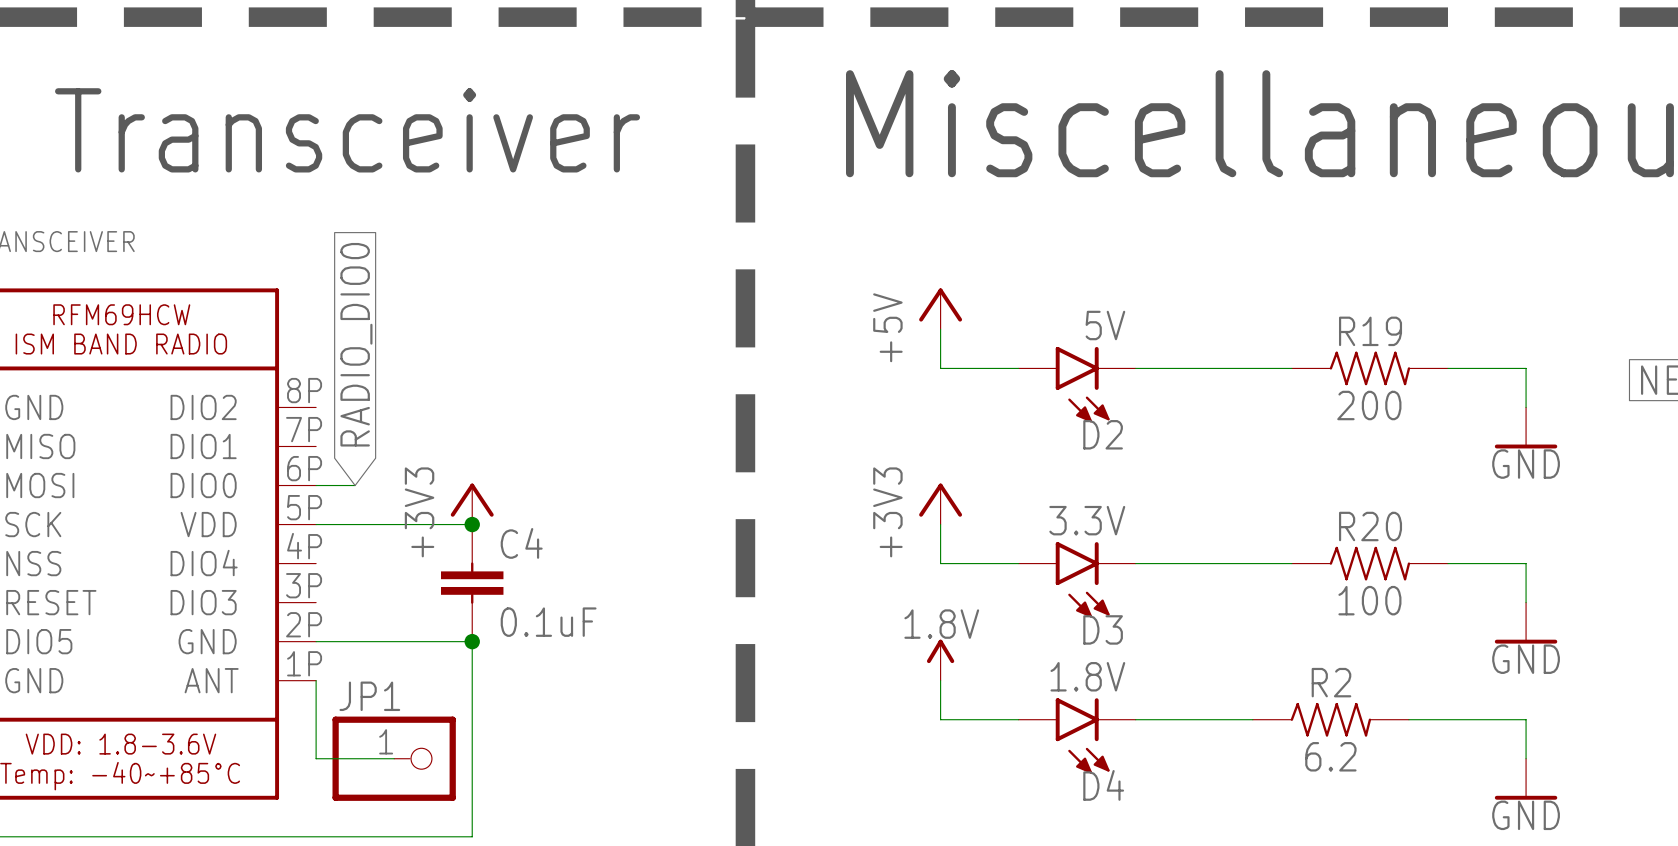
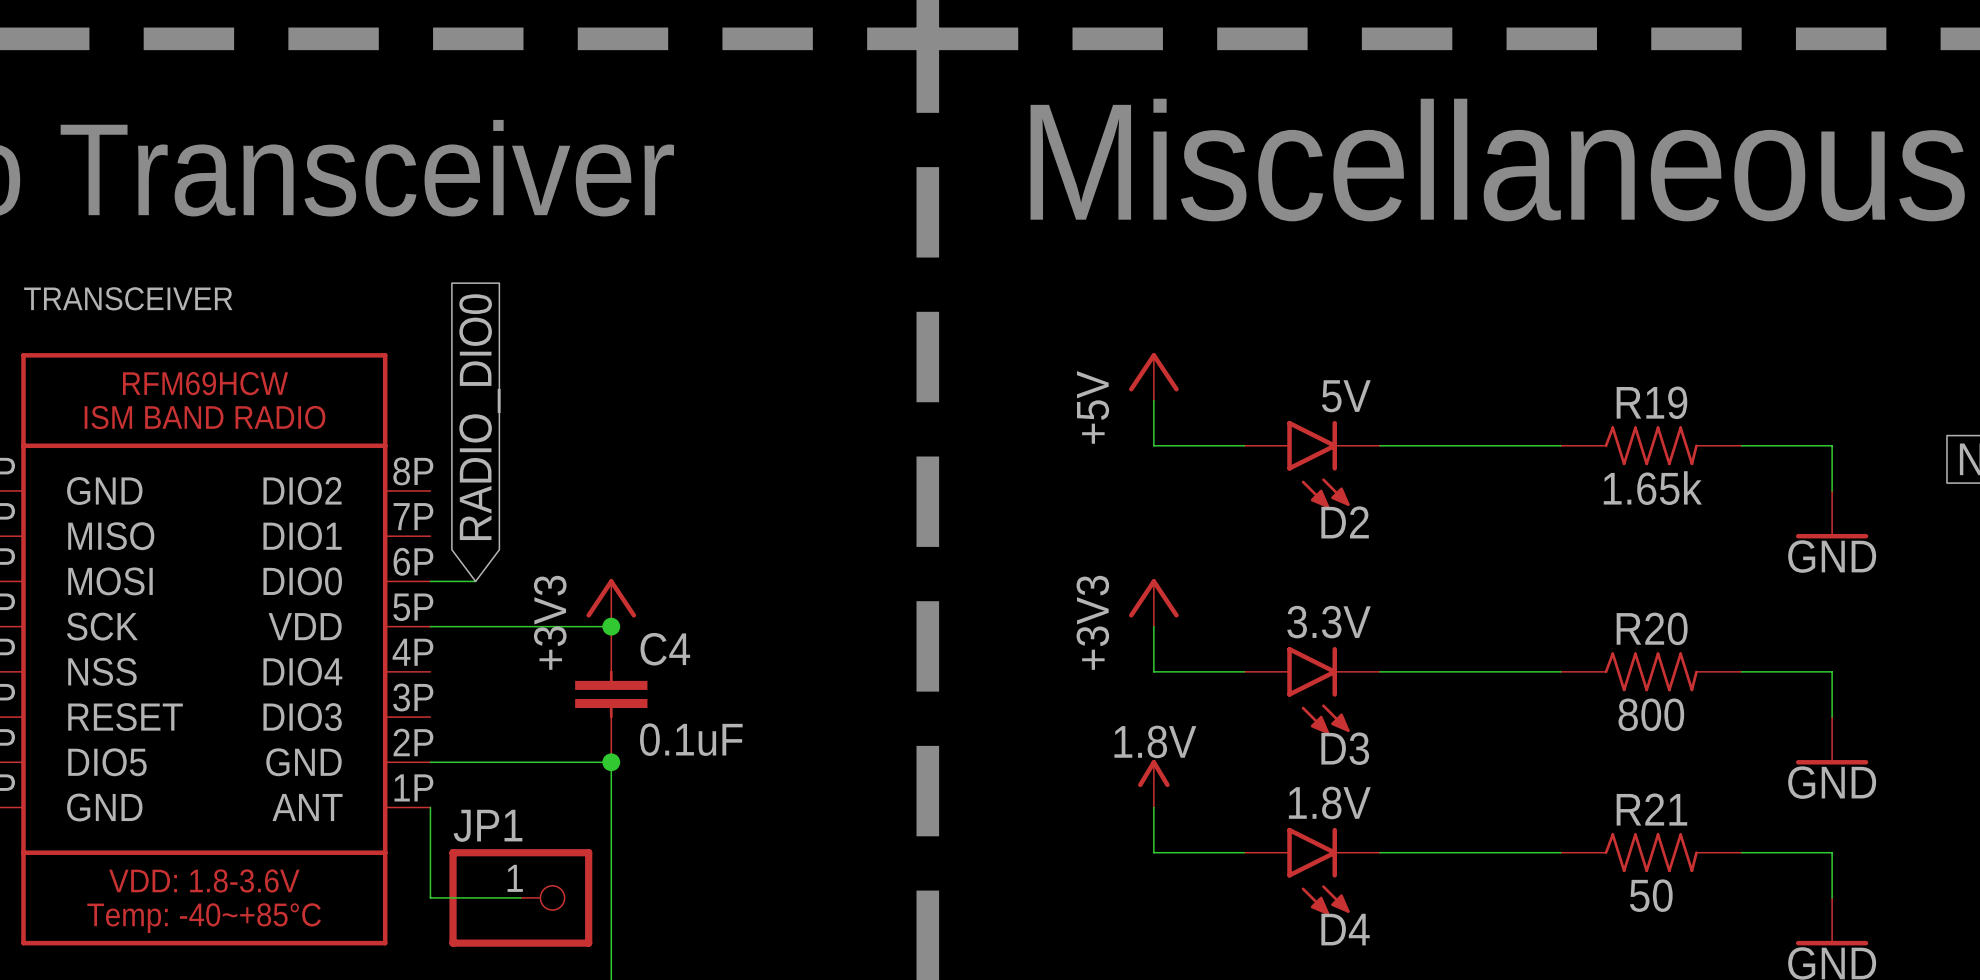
R19 value: 200 (1369, 405) -> 1.65k (1652, 488)
R20 value: 100 (1369, 600) -> 800 (1651, 714)
R2: 6.2 (1330, 719) -> none
R21: none -> 50 (1651, 852)

